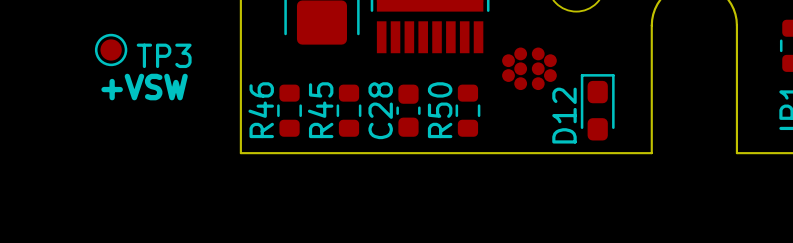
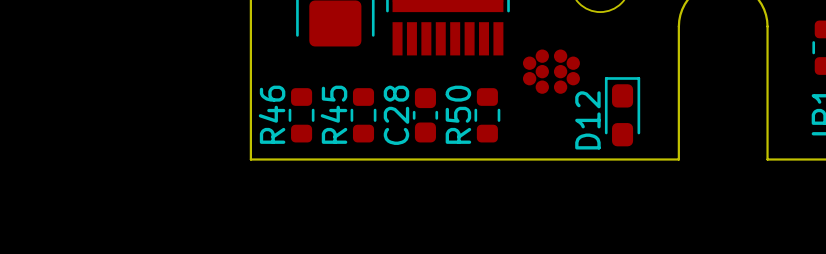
TP3: (111, 49) -> none
text: +VSW (144, 87) -> none

